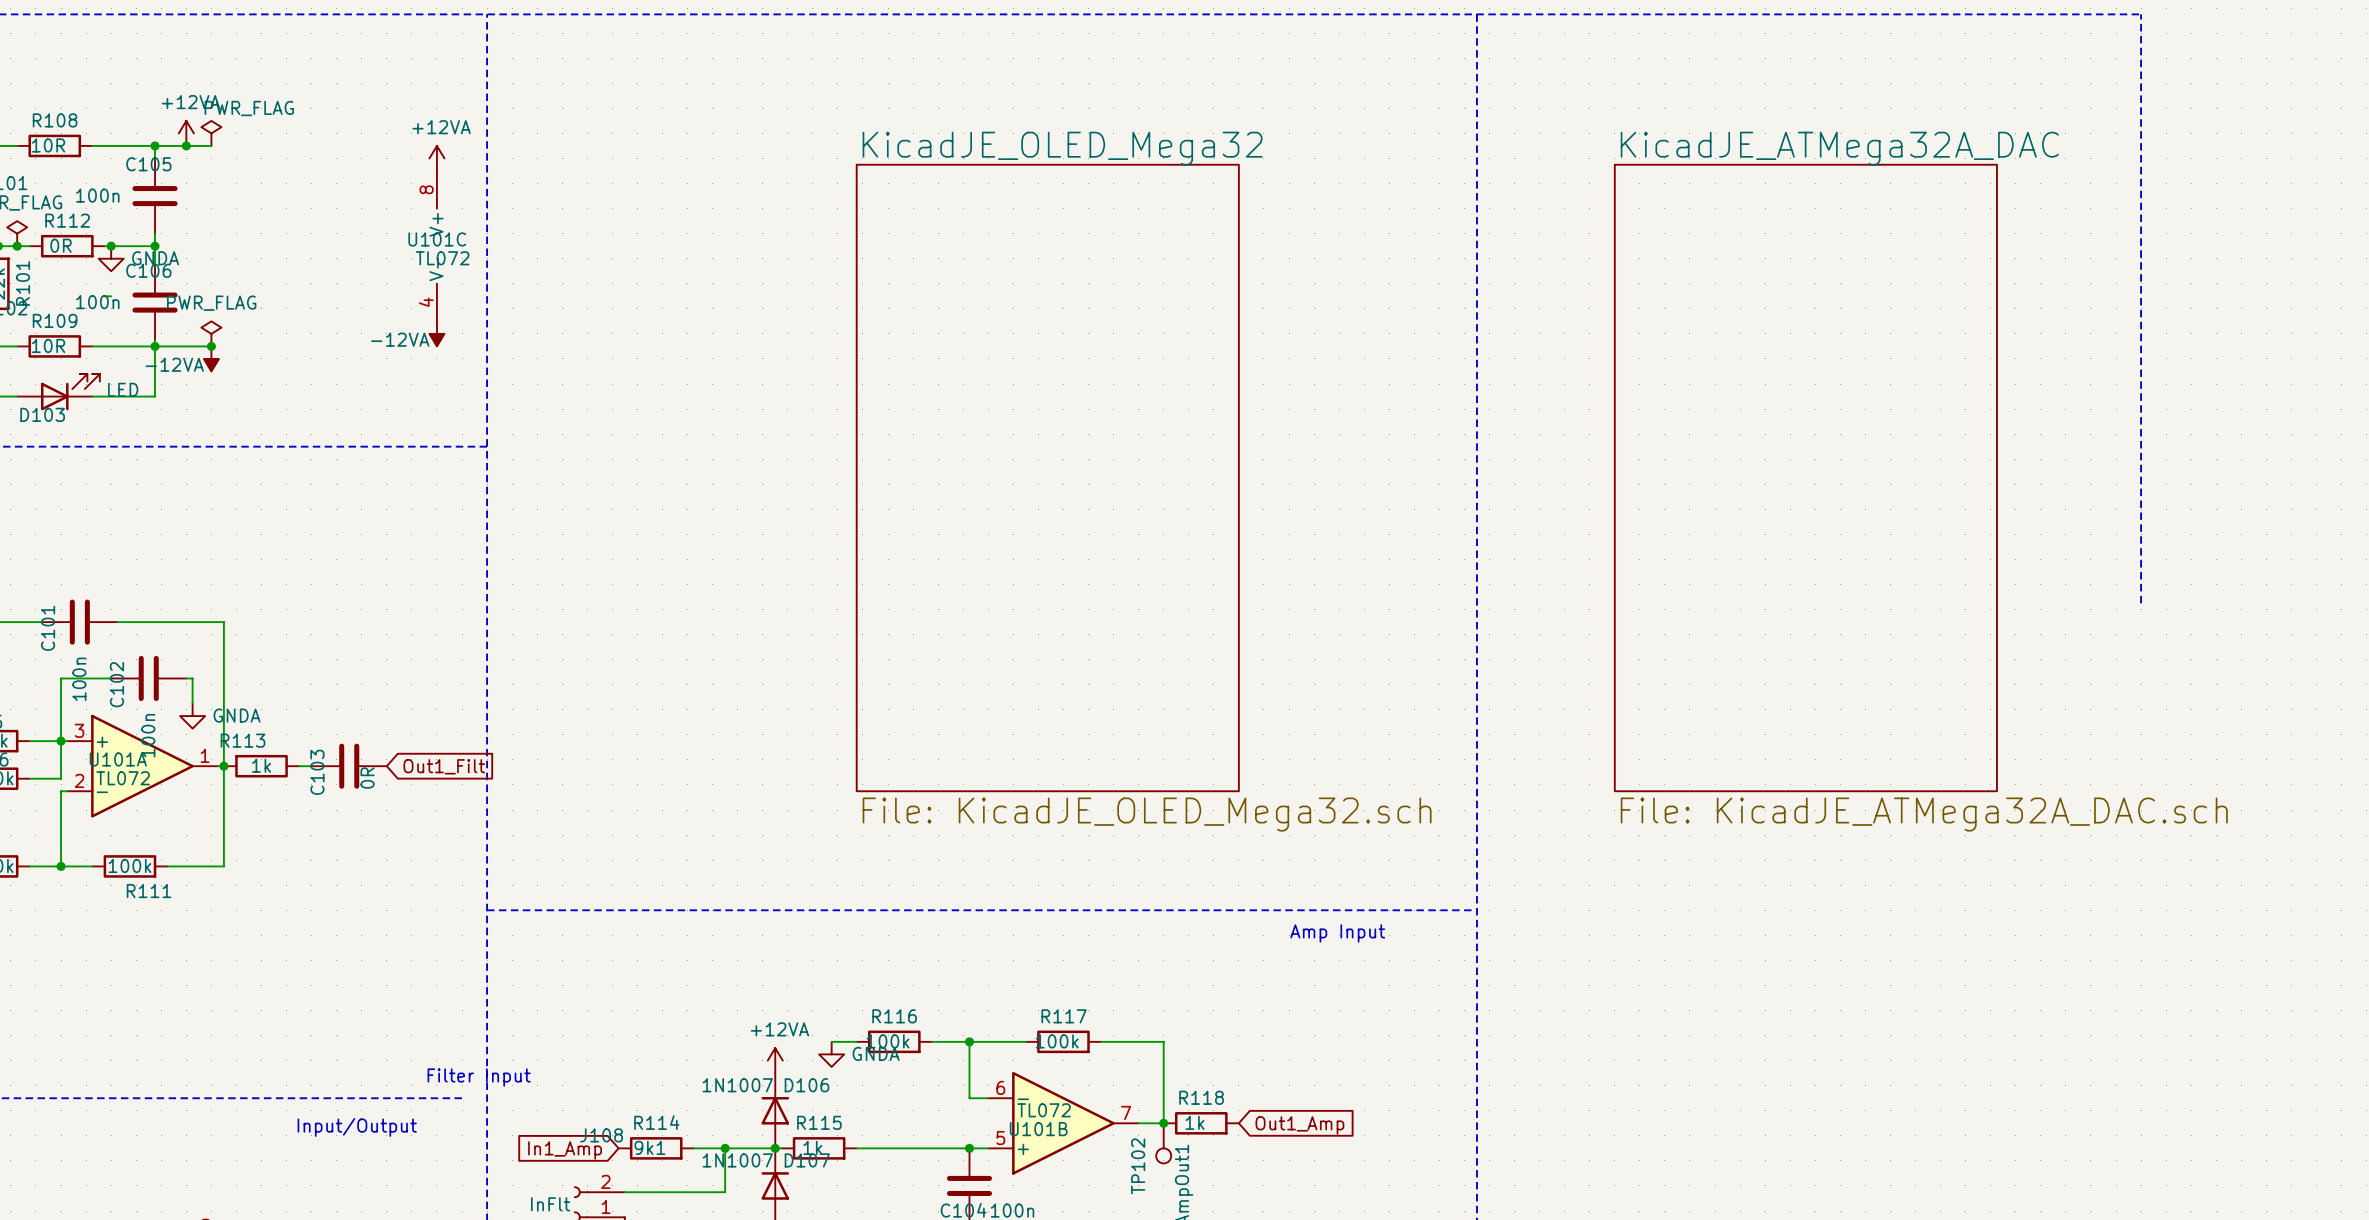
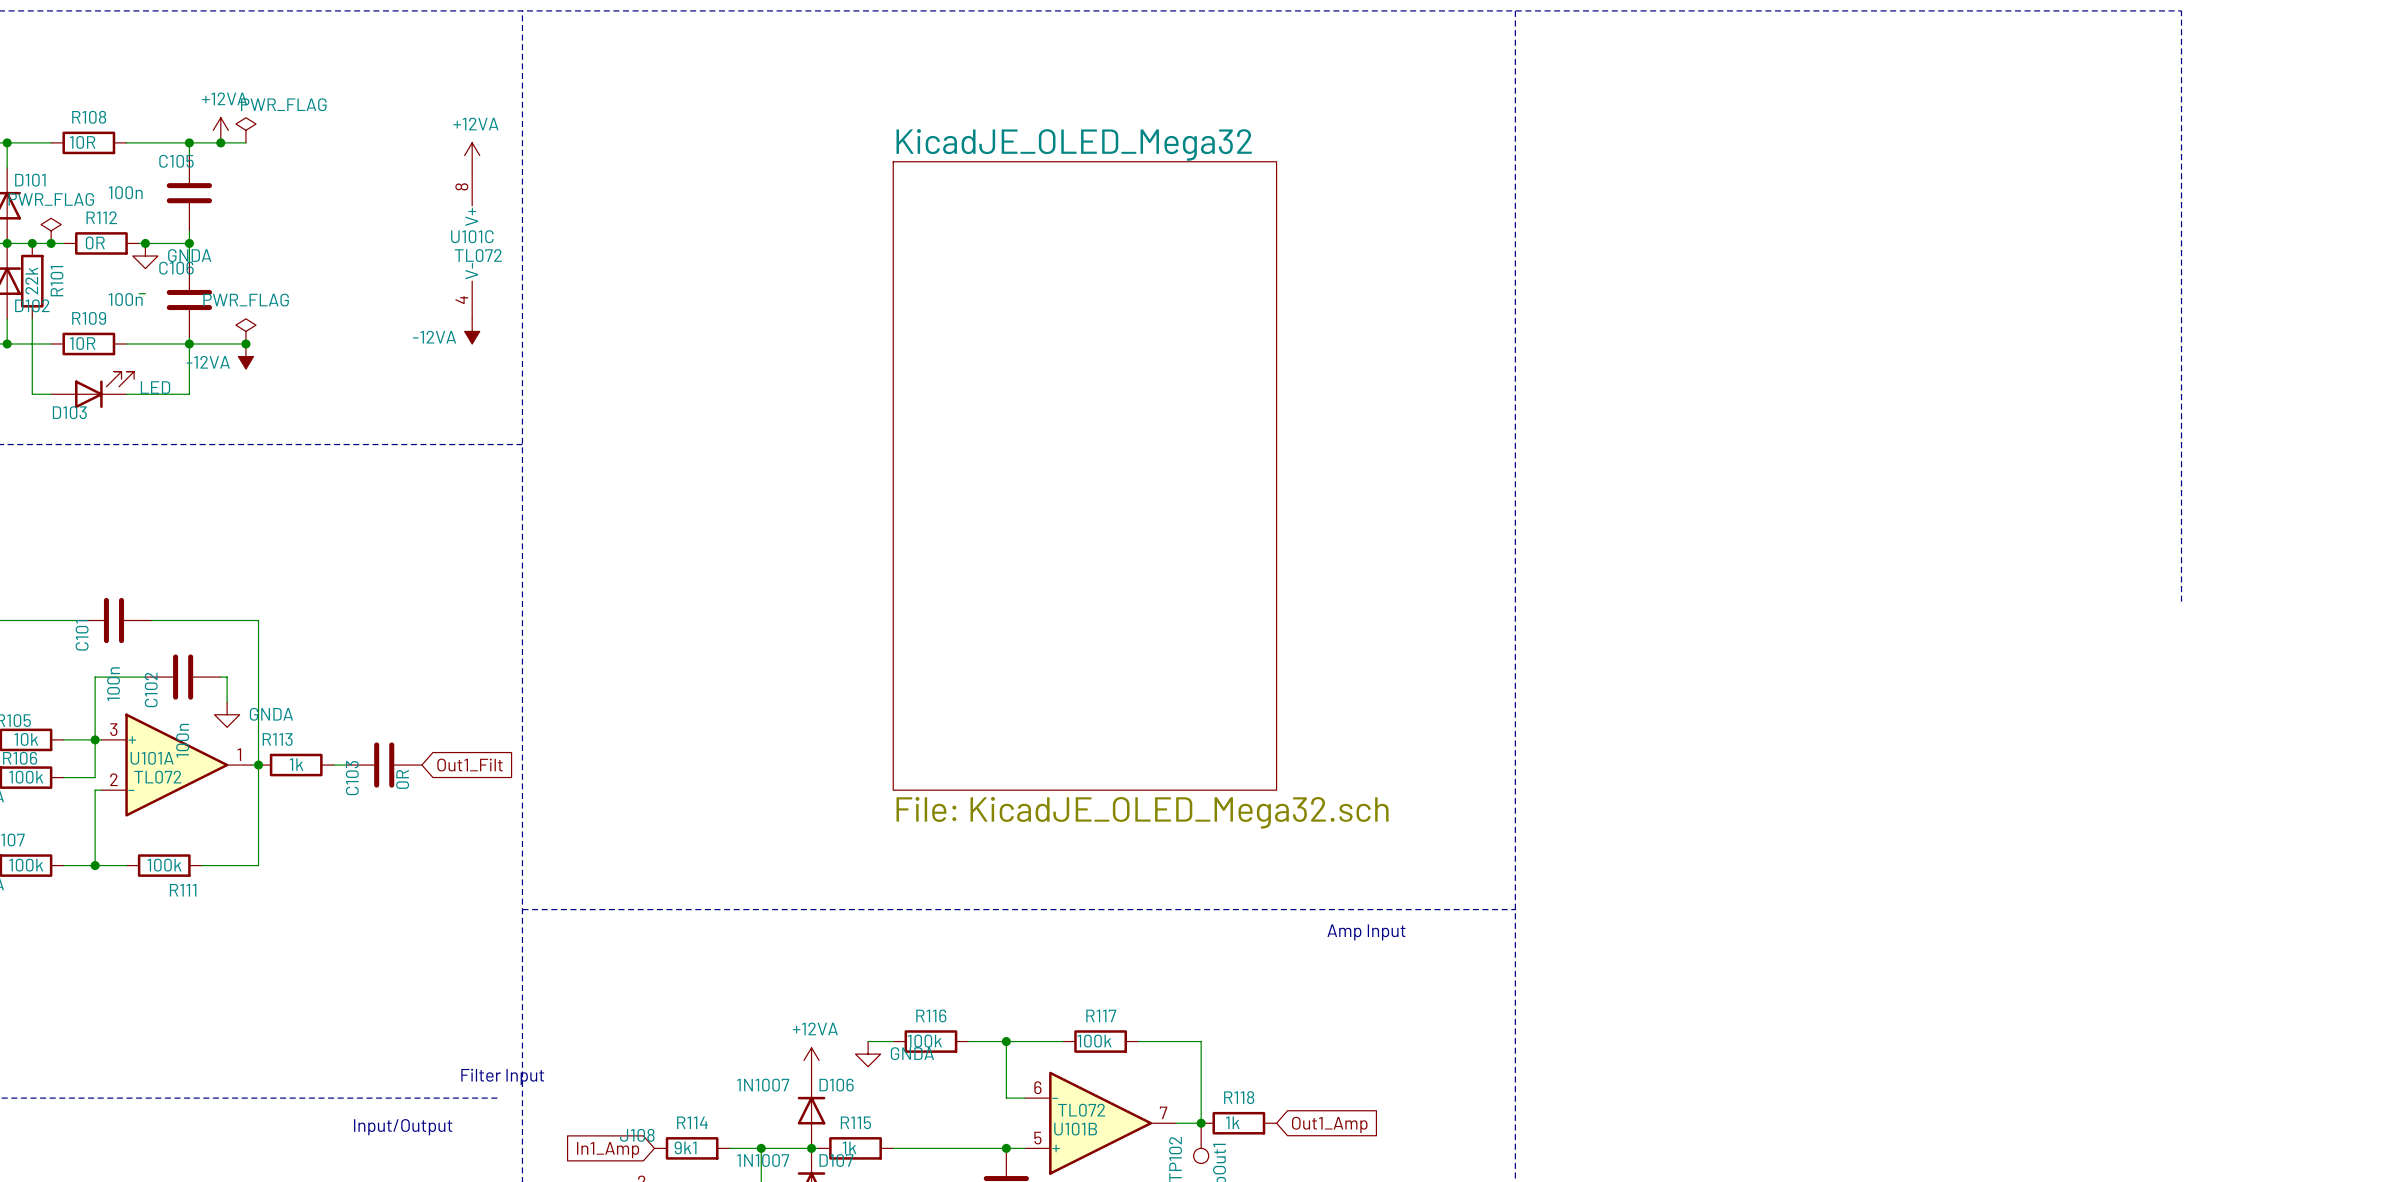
sheet KicadJE_ATMega32A_DAC: File: KicadJE_ATMega32A_DAC.sch (1805, 478) -> none

